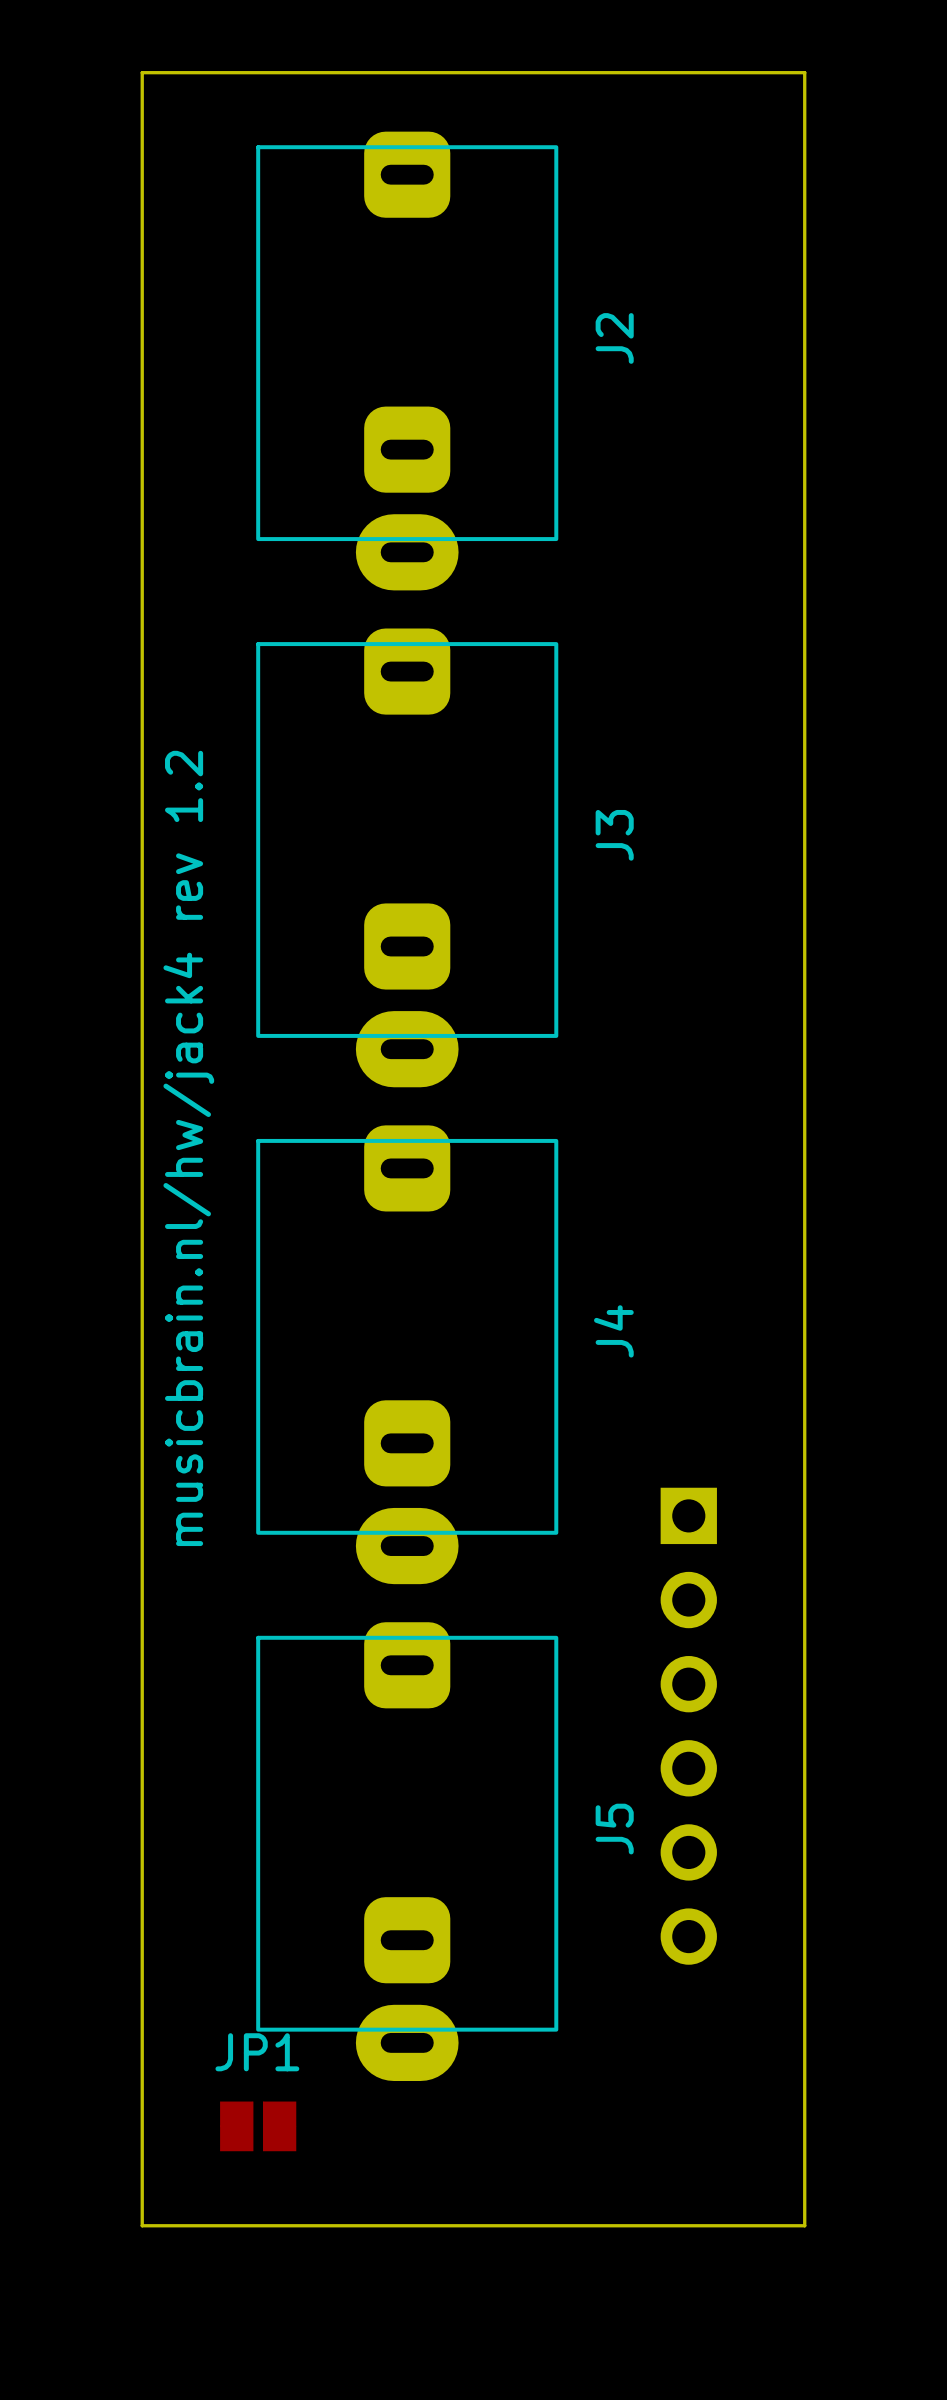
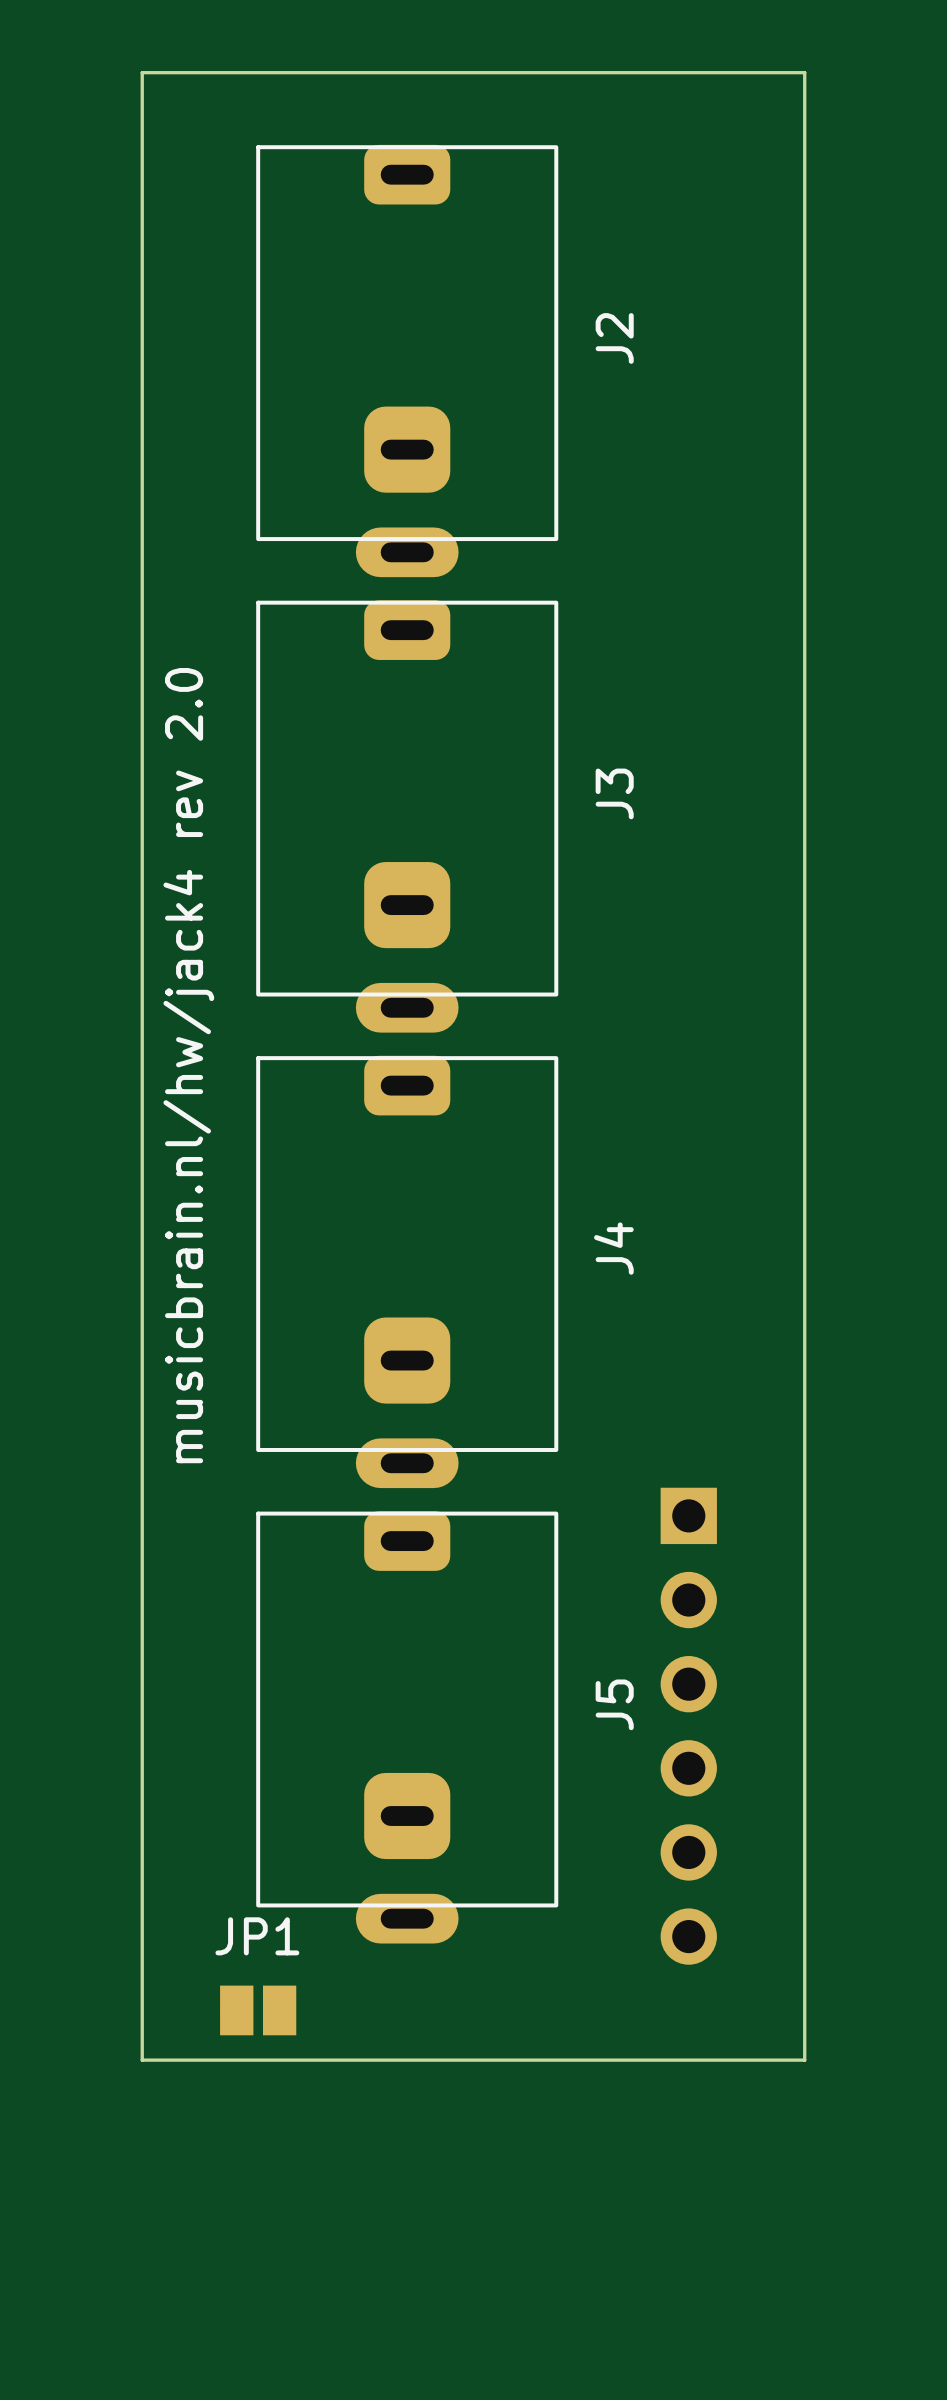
J2 footprint: [256, 131, 559, 591] -> [256, 144, 559, 578]
J3 footprint: [256, 628, 559, 1088] -> [256, 600, 559, 1033]
J4 footprint: [256, 1125, 559, 1585] -> [256, 1055, 559, 1489]
text: musicbrain.nl/hw/jack4 rev 1.2 (188, 1148) -> musicbrain.nl/hw/jack4 rev 2.0 (188, 1065)
J5 footprint: [256, 1622, 559, 2082] -> [256, 1511, 559, 1944]
board edge: (142, 2060) (142, 2225) (804, 2225) (804, 2060) -> (142, 2060) (804, 2060)
JP1 position: (258, 2126) -> (258, 2010)

